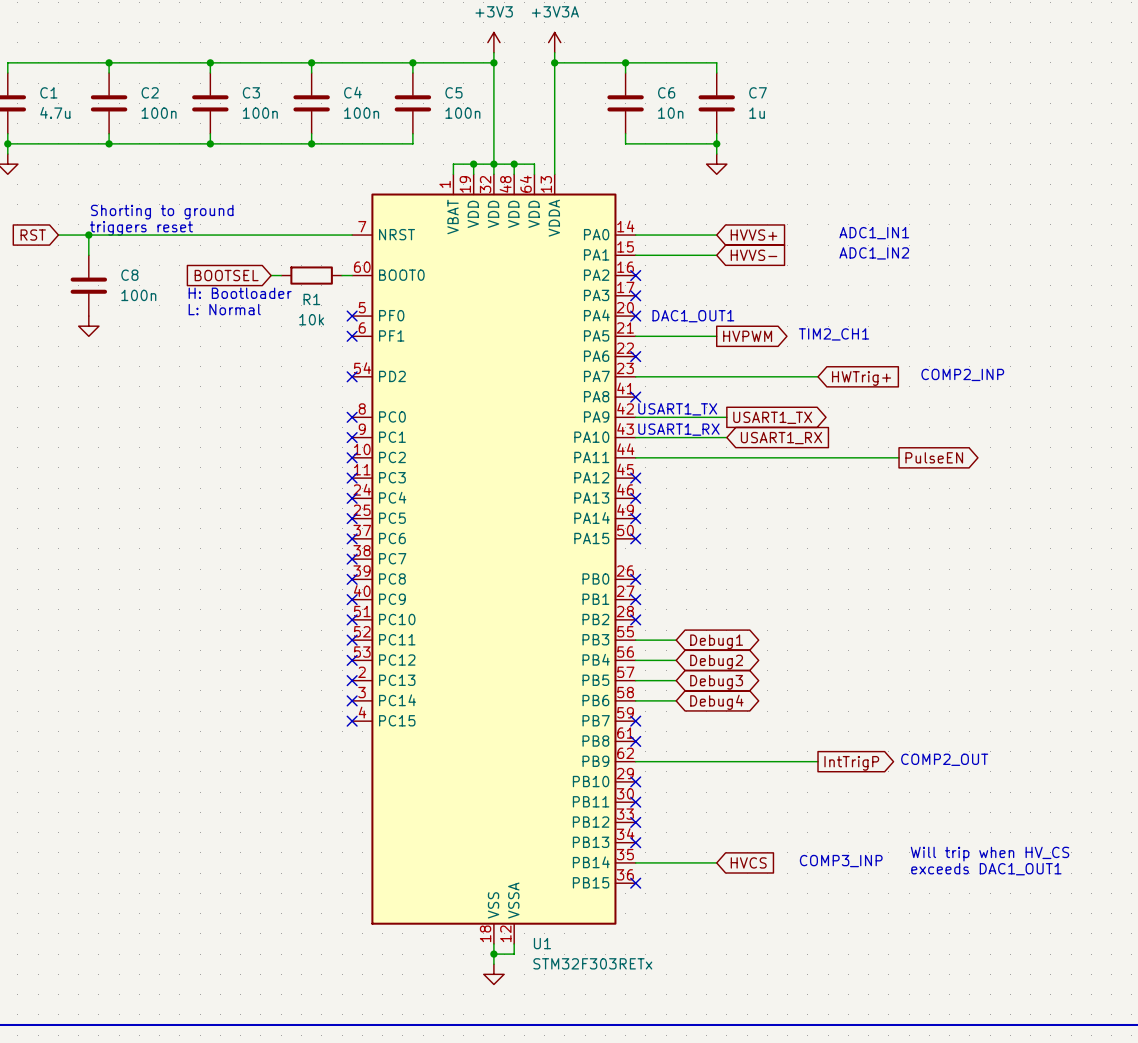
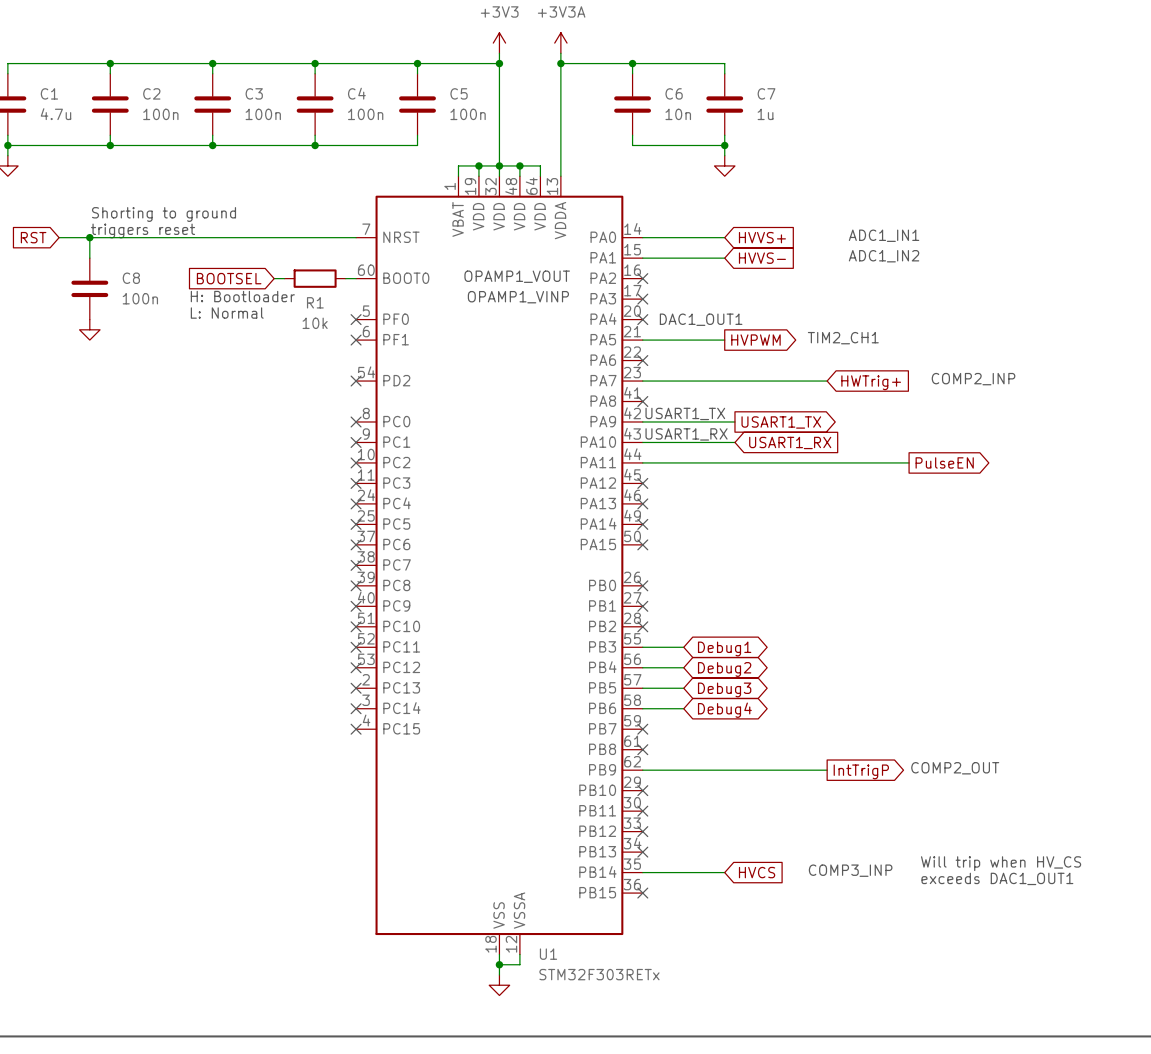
text: none -> OPAMP1_VOUT (517, 276)
text: none -> OPAMP1_VINP (518, 297)

